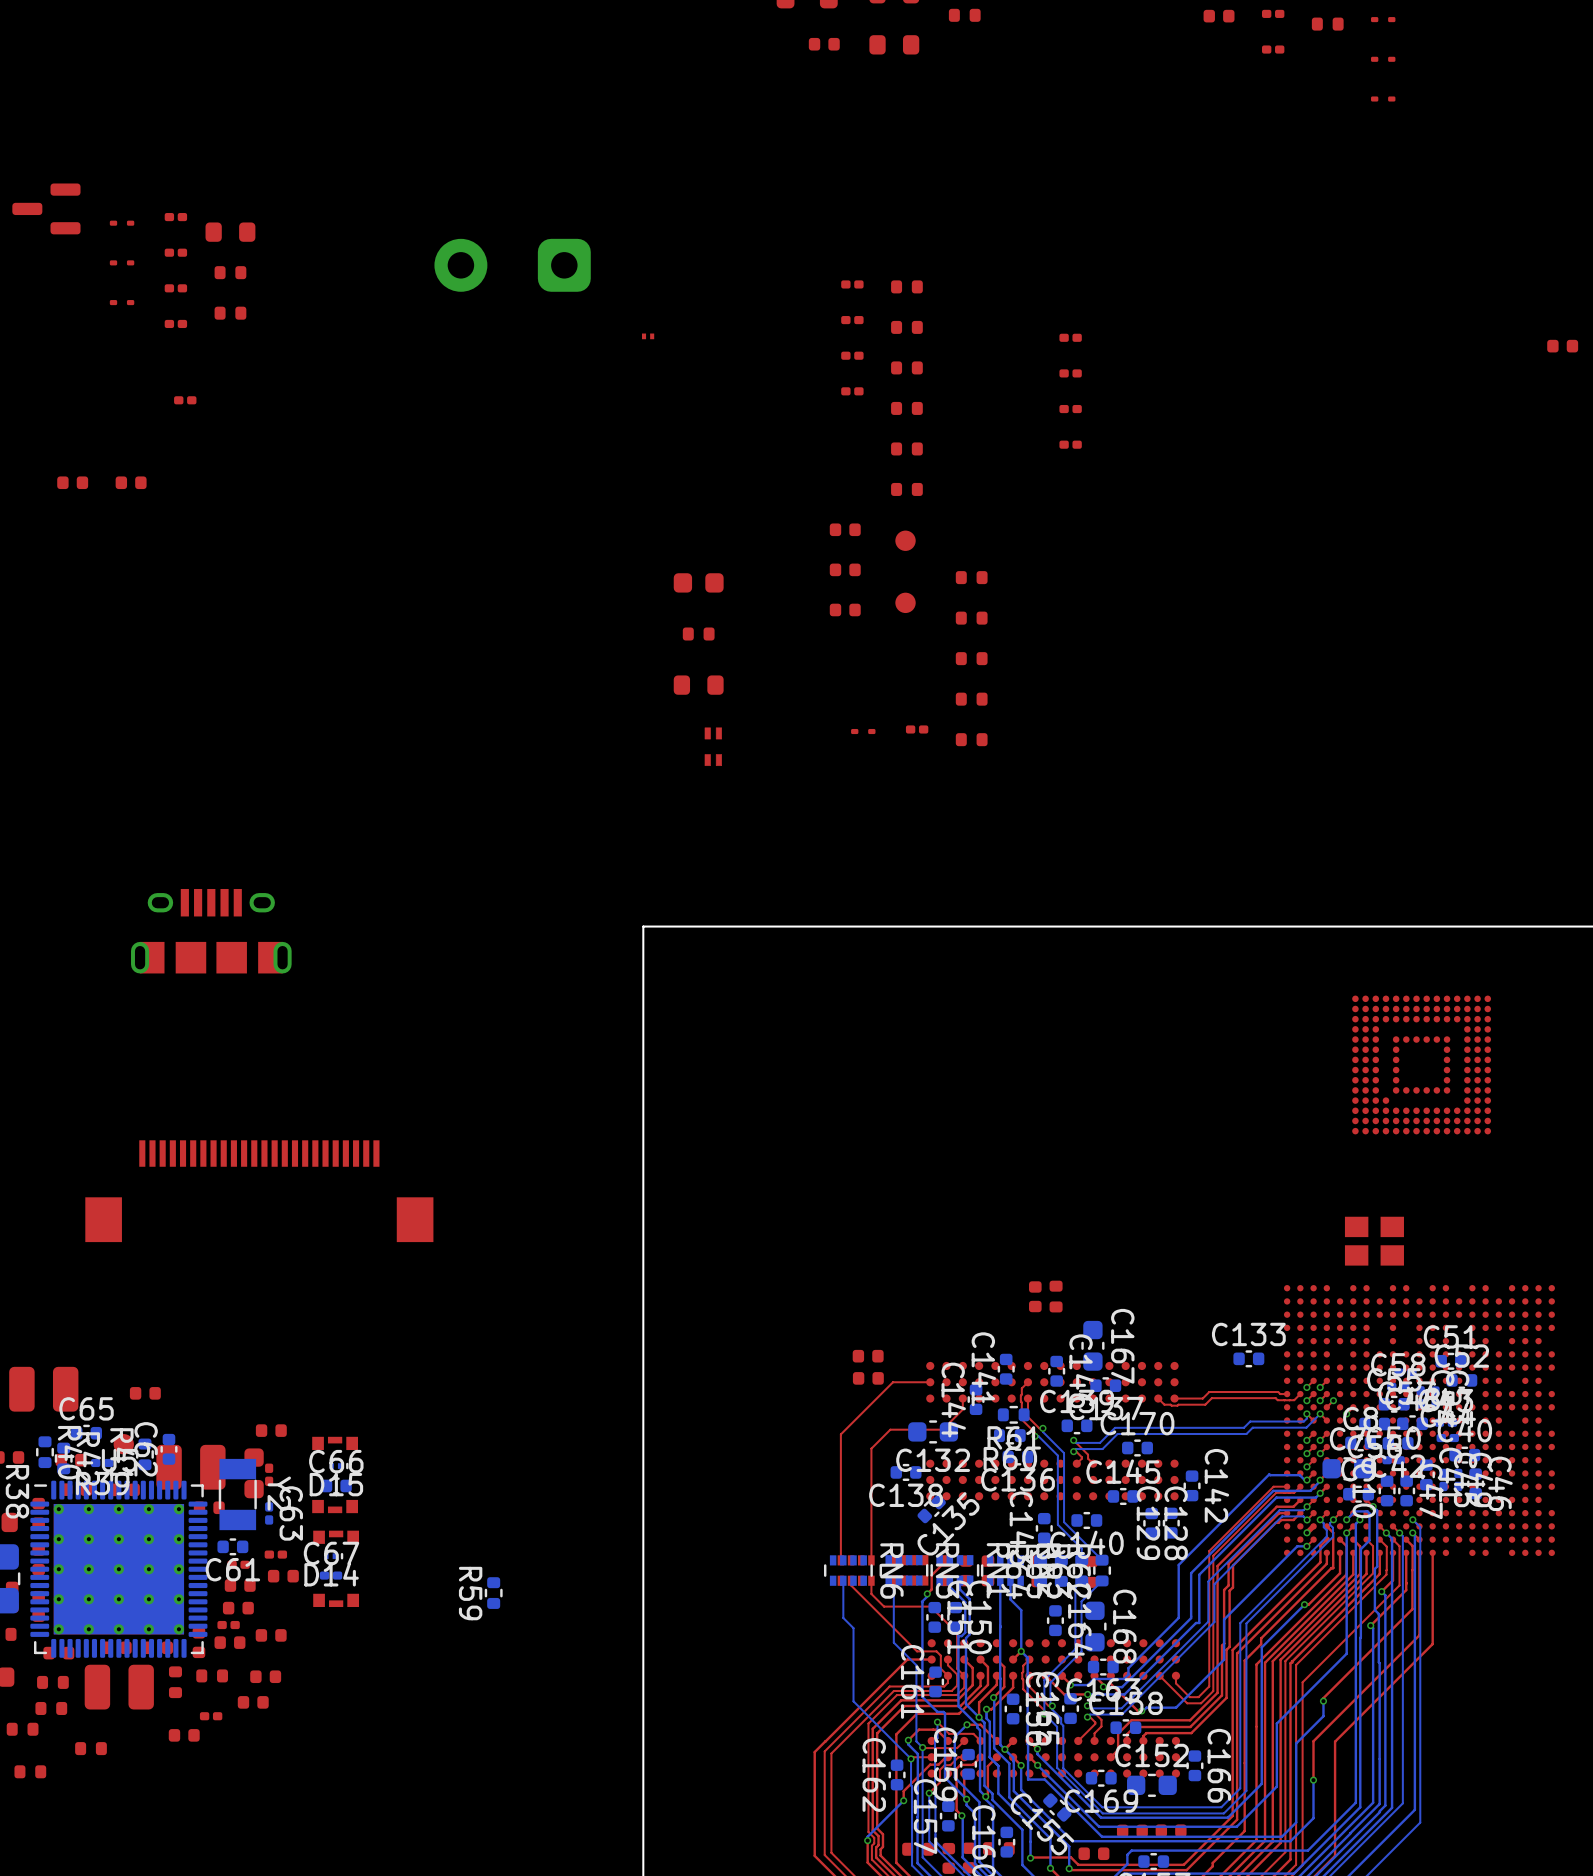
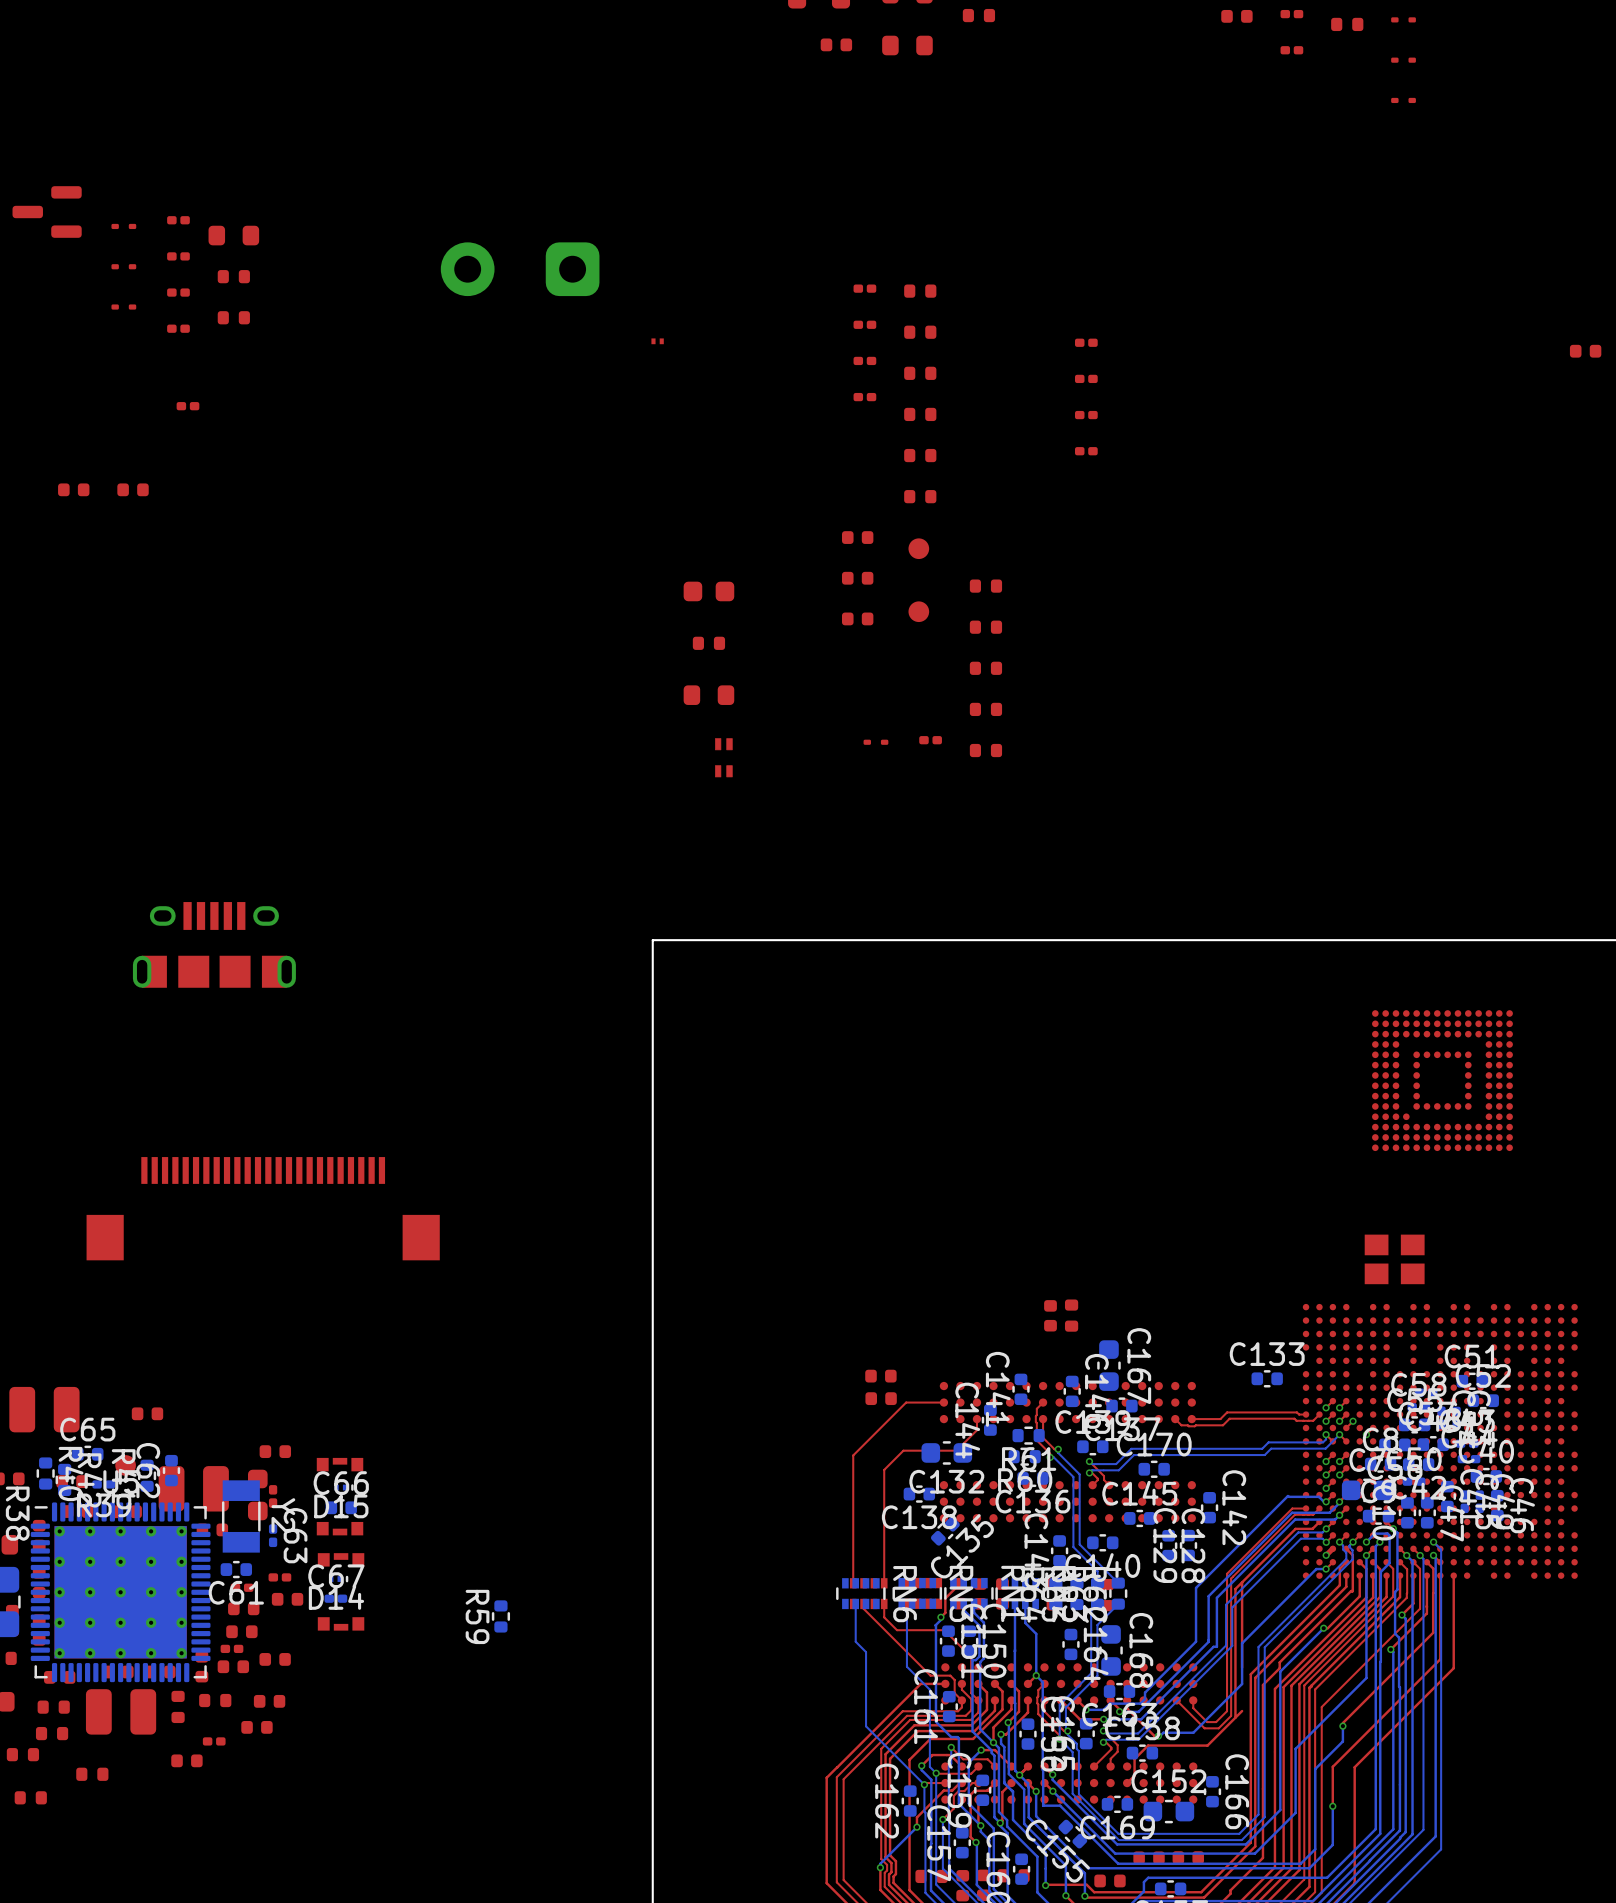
top track: (1287, 1513) (1279, 1513) (1228, 1563) (1228, 1585) (1224, 1589) -> (1242, 1582) (1242, 1613)
top track: (1300, 1513) (1293, 1519) (1281, 1519) (1275, 1522) (1233, 1565) (1233, 1587) (1229, 1590) (1229, 1646) (1226, 1649) (1226, 1697) (1191, 1733) (1146, 1733) (1143, 1736) (1143, 1740) -> none
top track: (1224, 1643) (1222, 1645) (1222, 1695) (1190, 1727) (1134, 1727) (1127, 1734) (1127, 1740) -> none

